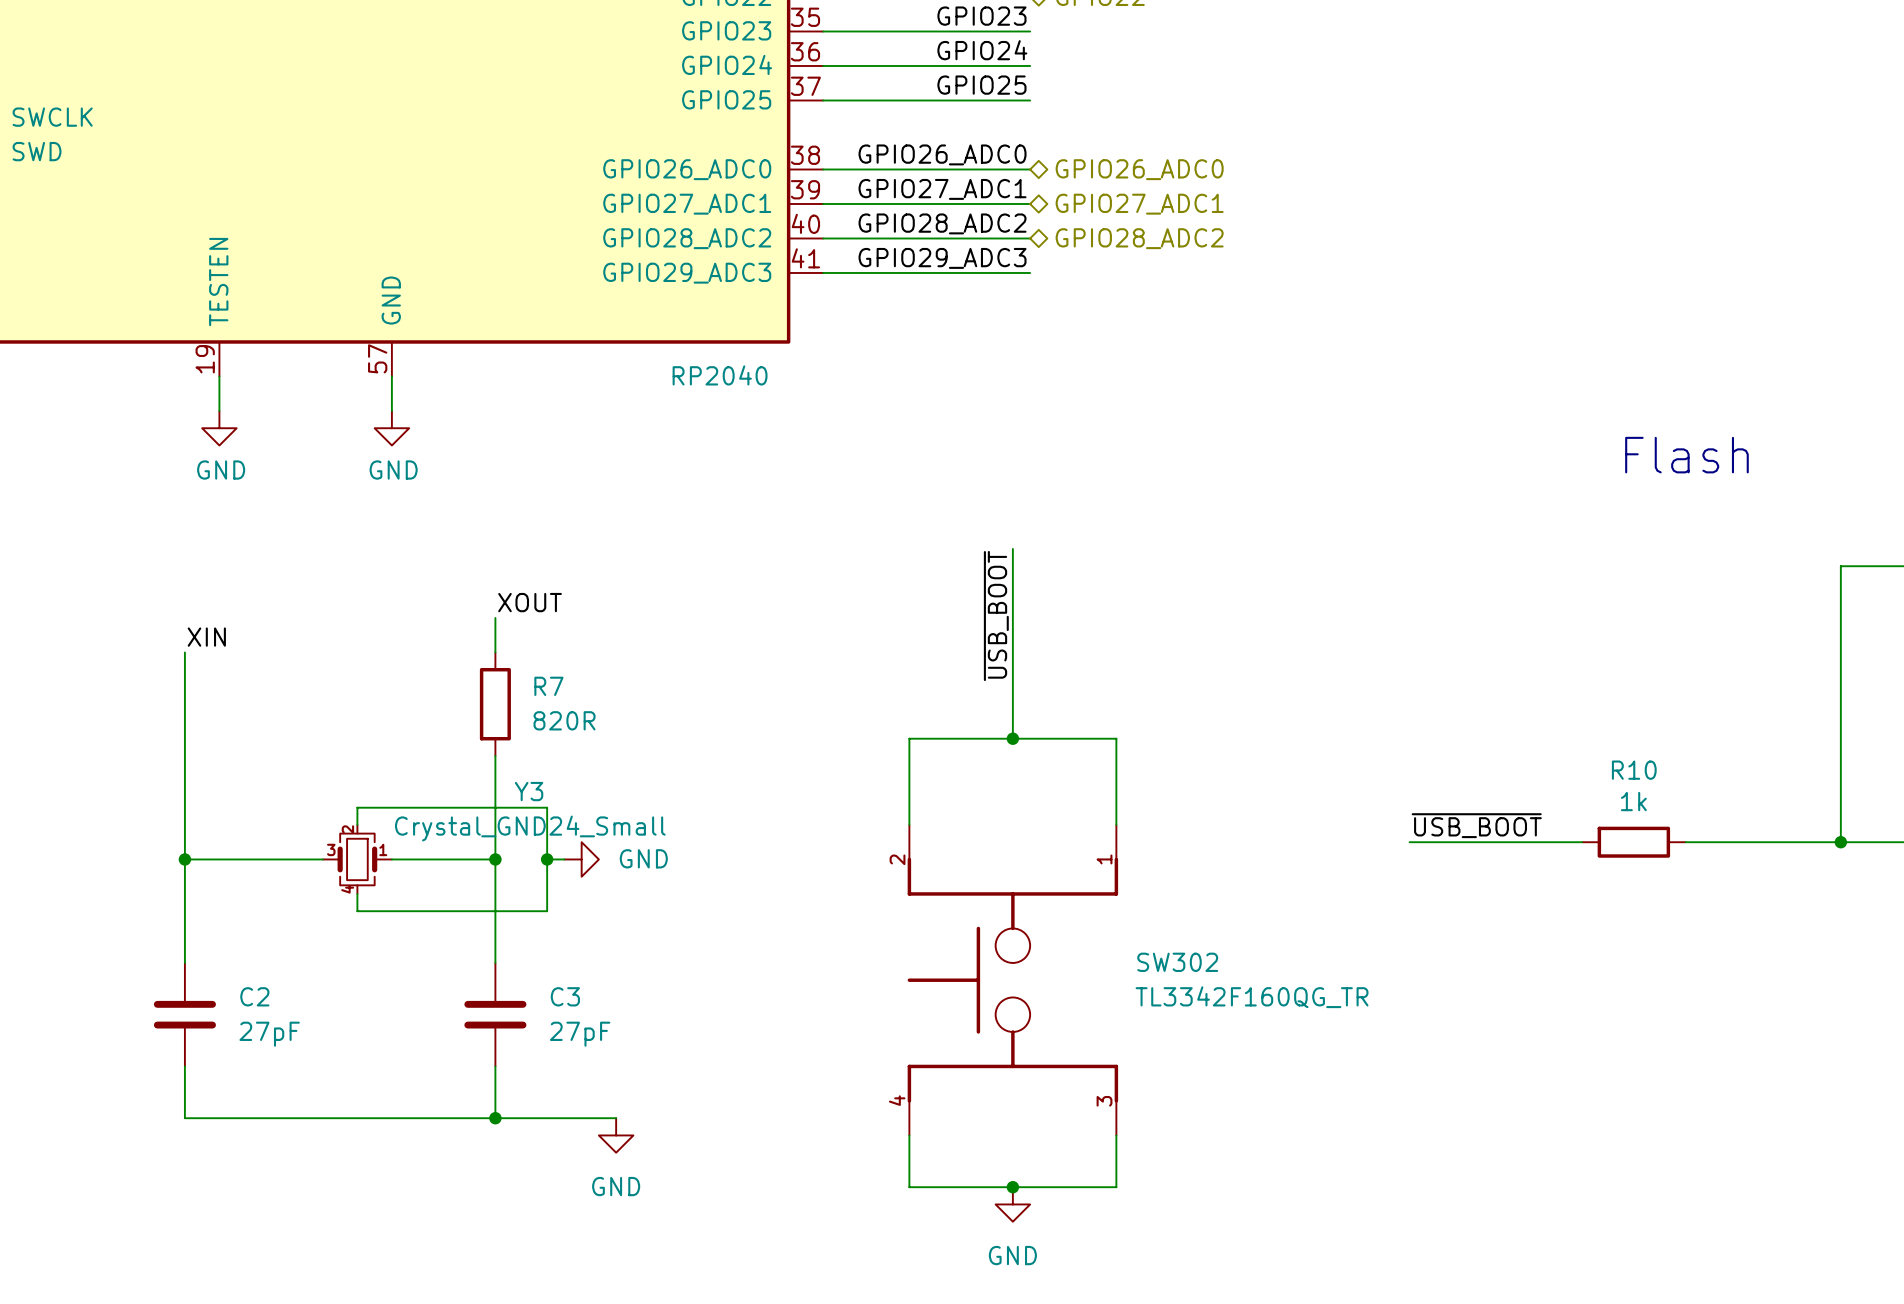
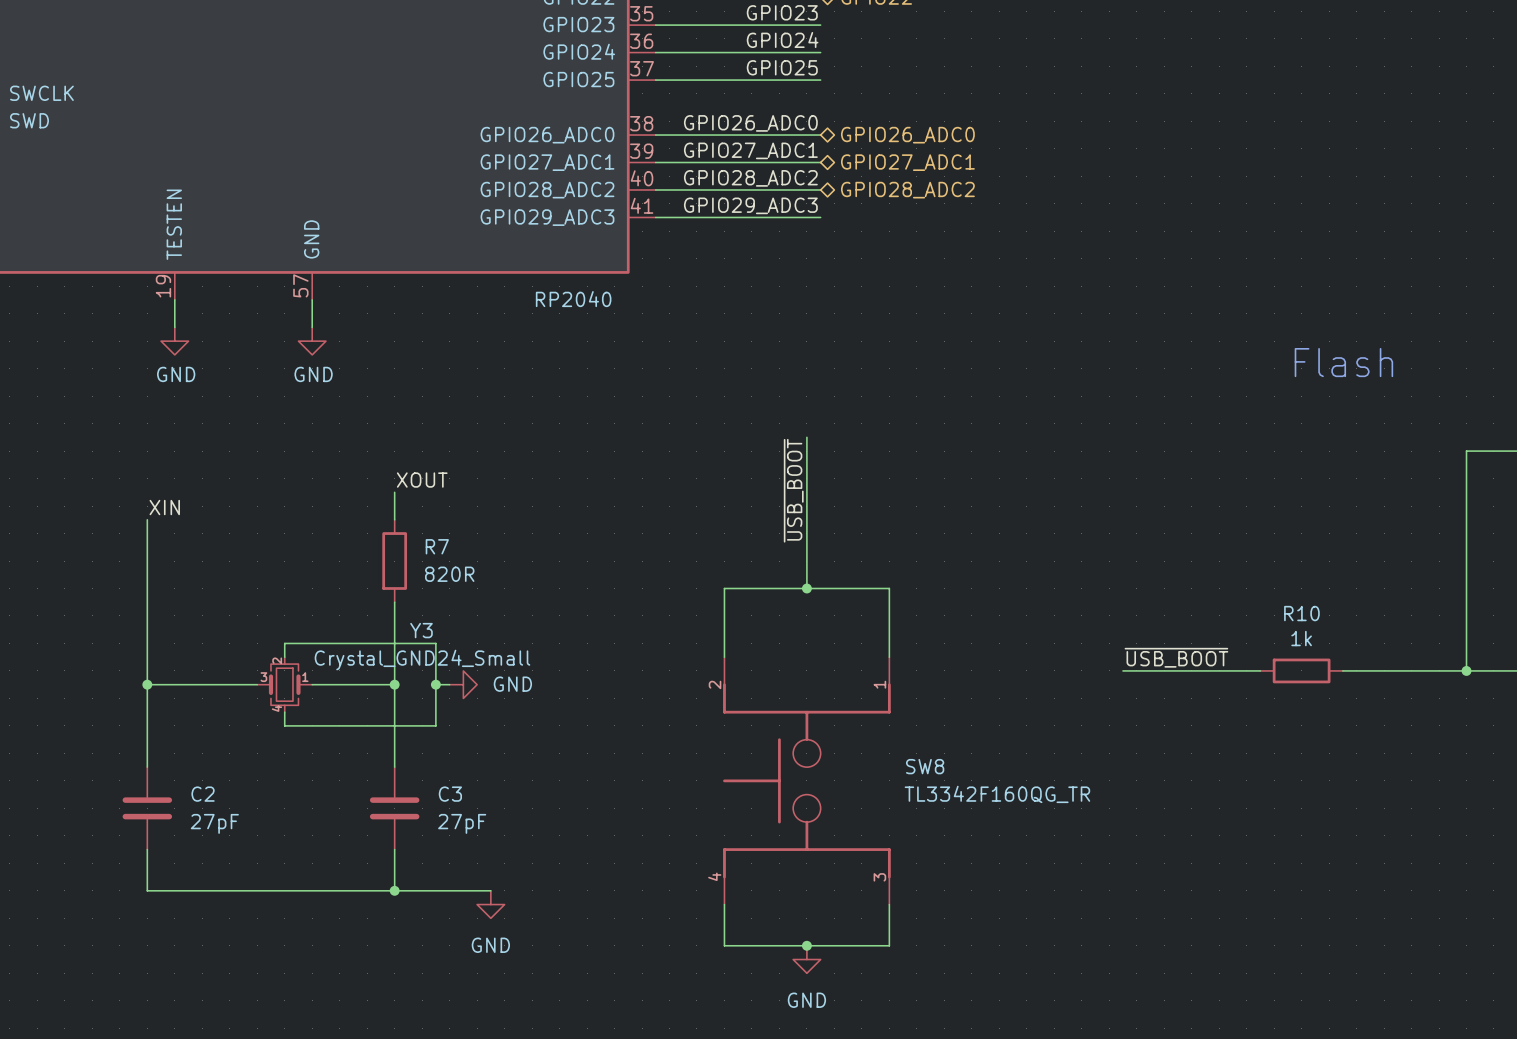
SW302 name: SW302 (1177, 962) -> SW8 (925, 766)

